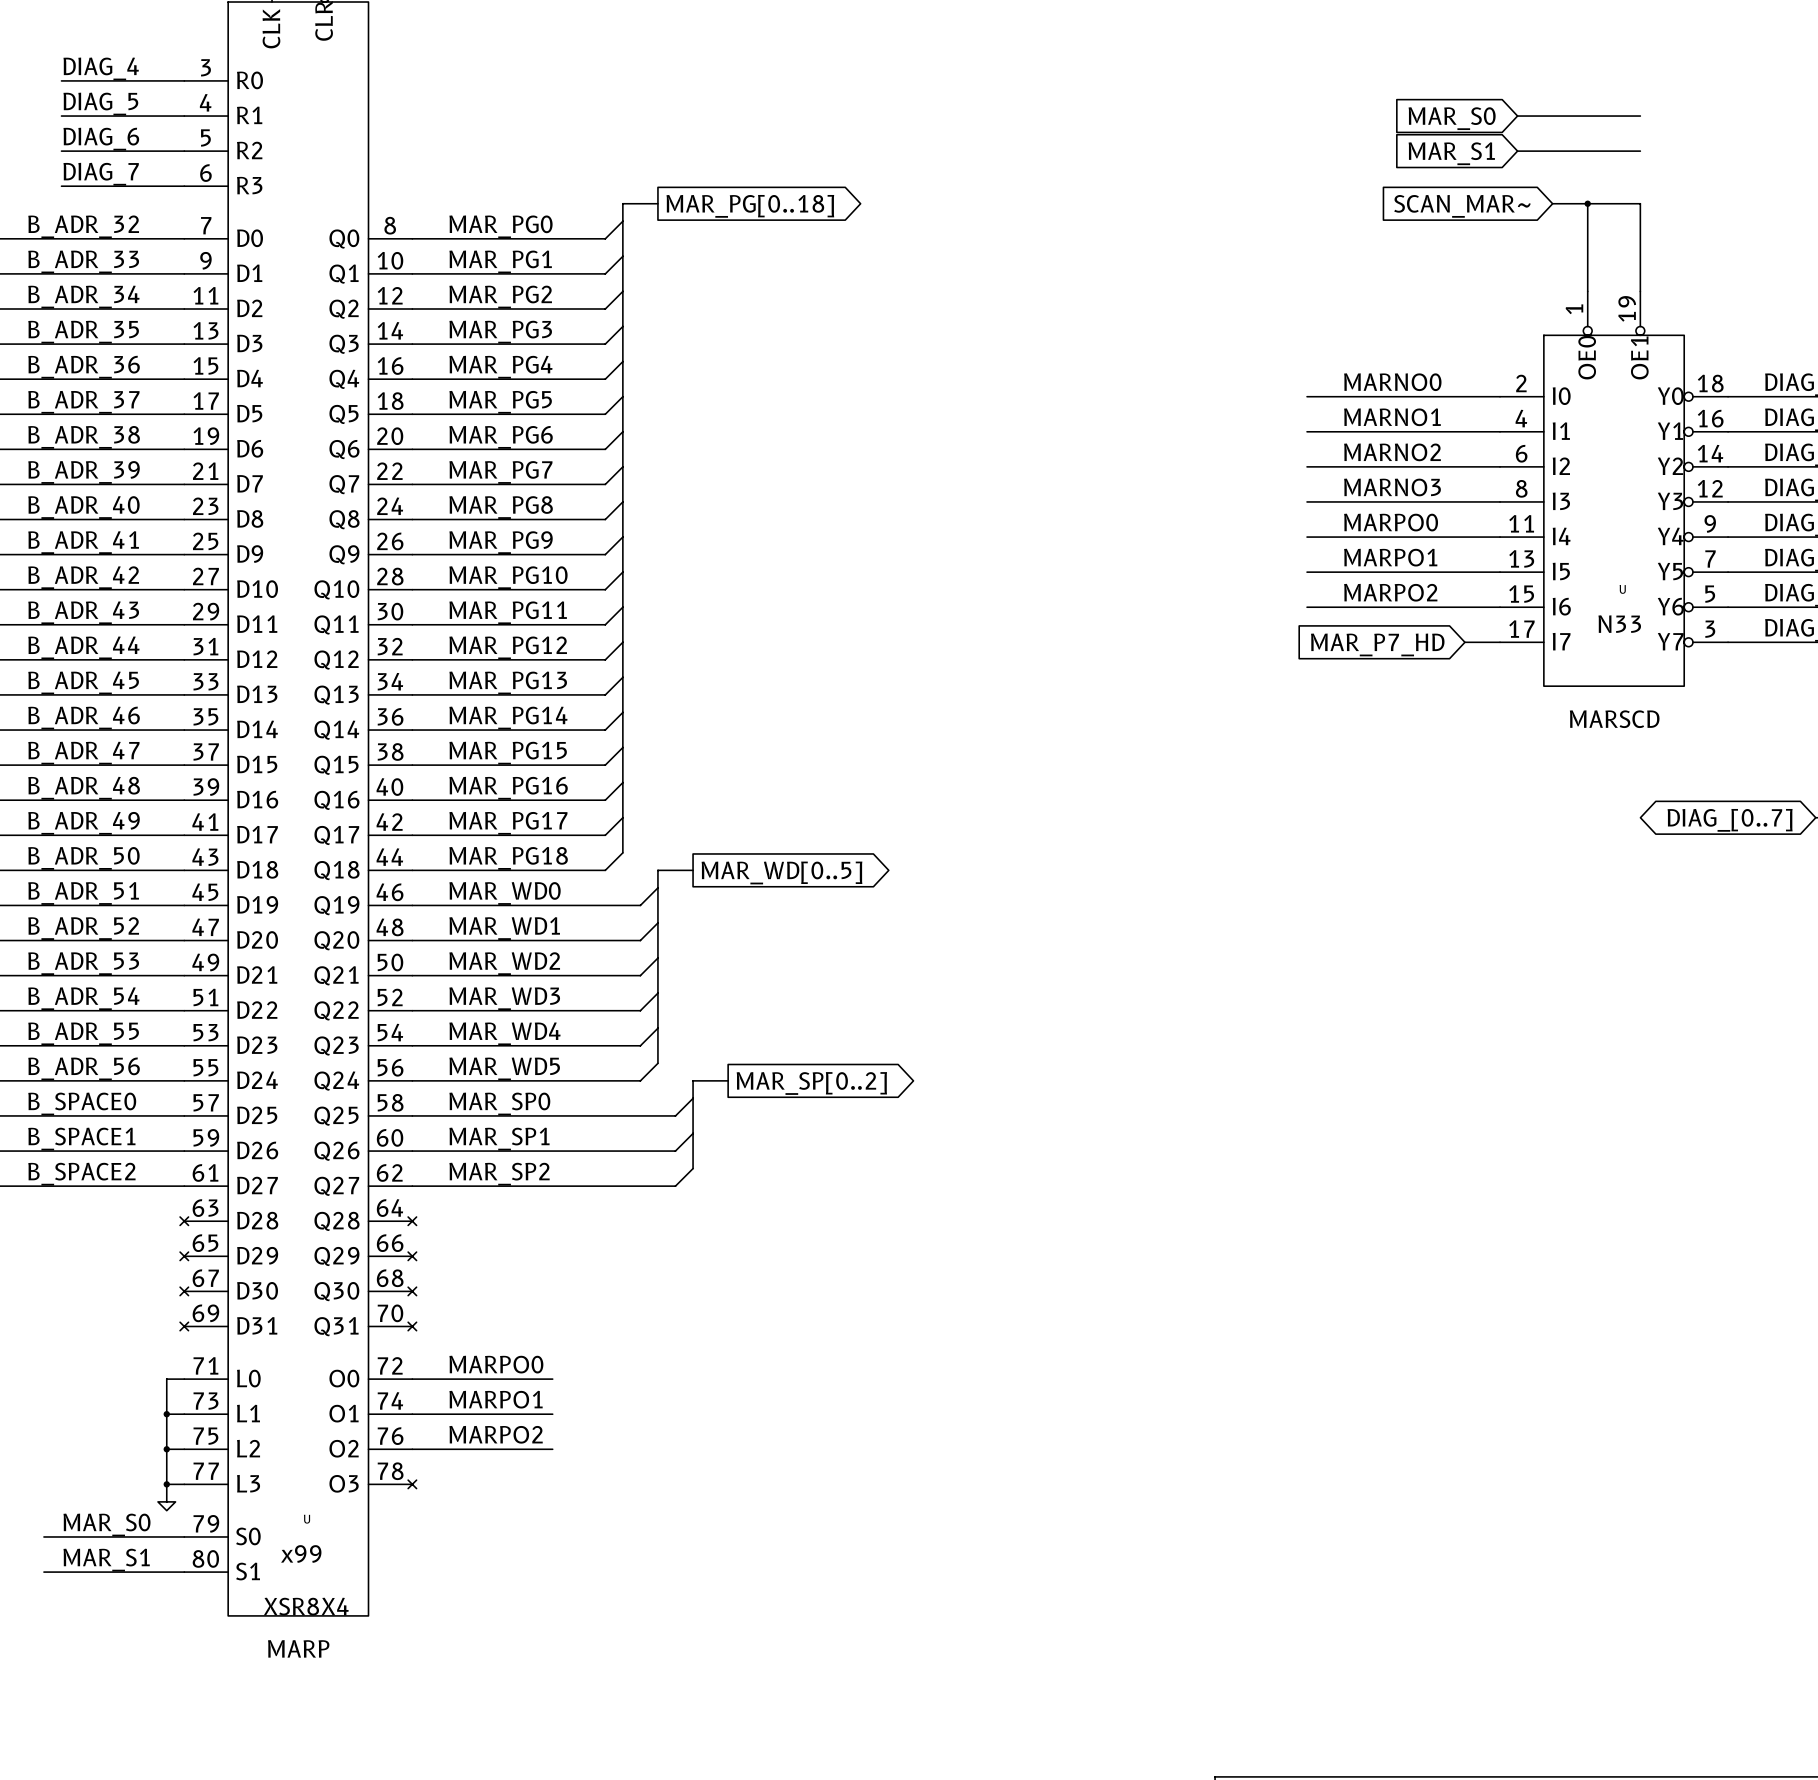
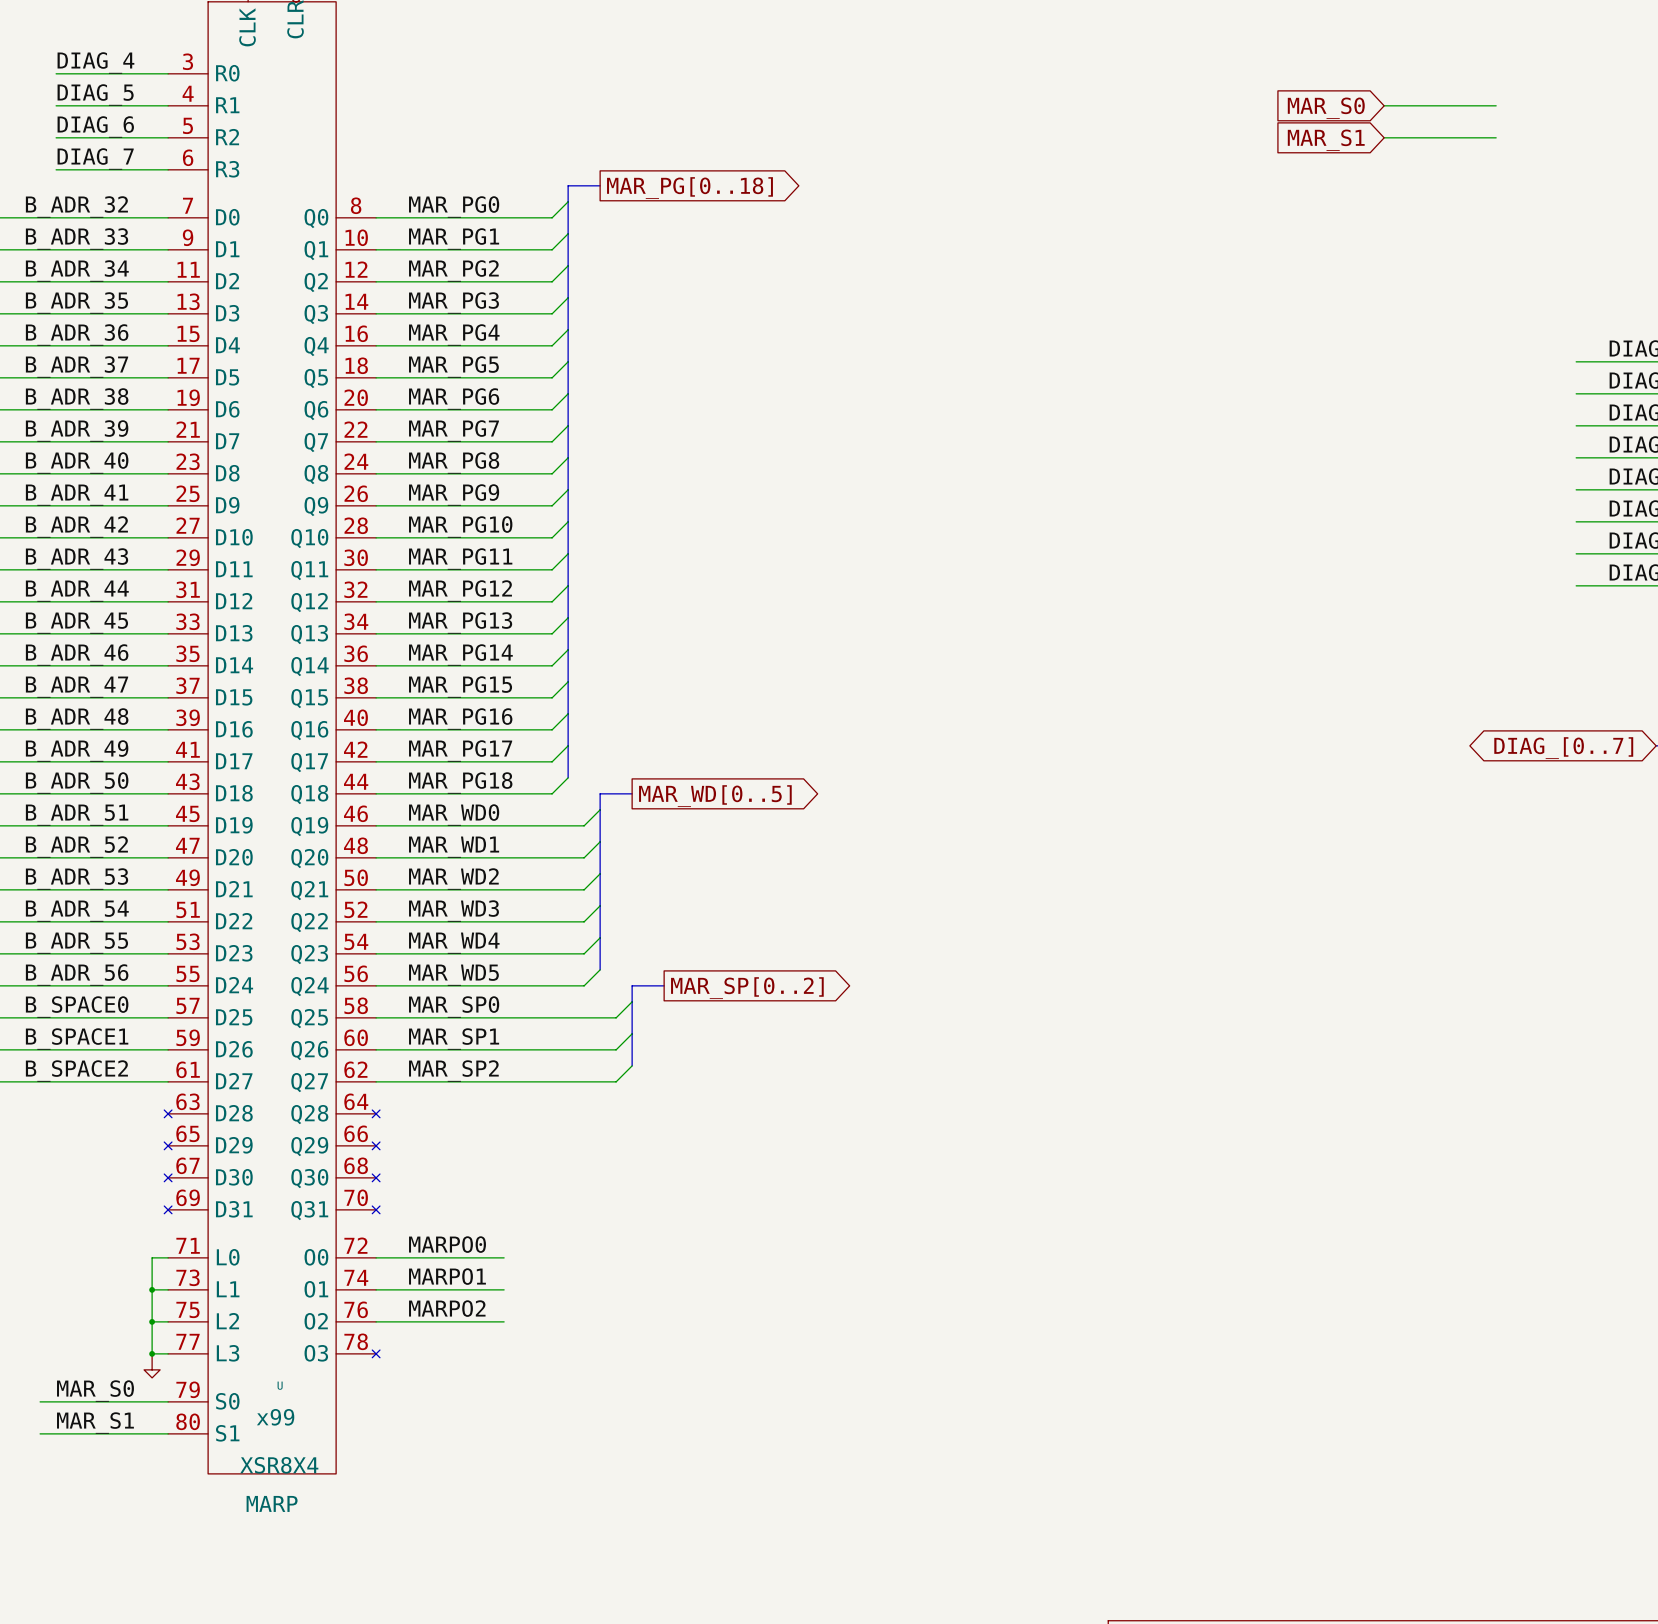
wire: (1552, 203) (1640, 203) (1640, 291) -> none
wire: (1587, 203) (1587, 291) -> none
junction: (1587, 203) -> none
global label: SCAN_MAR~ (1462, 206) -> none
label: MARNO0 (1392, 382) -> none
wire: (1307, 396) (1500, 396) -> none
label: MARNO1 (1392, 417) -> none
wire: (1307, 431) (1500, 431) -> none
label: MARNO2 (1392, 452) -> none
wire: (1307, 466) (1500, 466) -> none
label: MARNO3 (1392, 487) -> none
U: (1614, 488) -> none
wire: (1307, 501) (1500, 501) -> none
label: MARPO0 (1391, 522) -> none
wire: (1307, 537) (1500, 537) -> none
label: MARPO1 (1390, 557) -> none
wire: (1307, 572) (1500, 572) -> none
label: MARPO2 (1390, 592) -> none
wire: (1307, 607) (1500, 607) -> none
wire: (1464, 642) (1500, 642) -> none
global label: MAR_P7_HD (1377, 644) -> none

